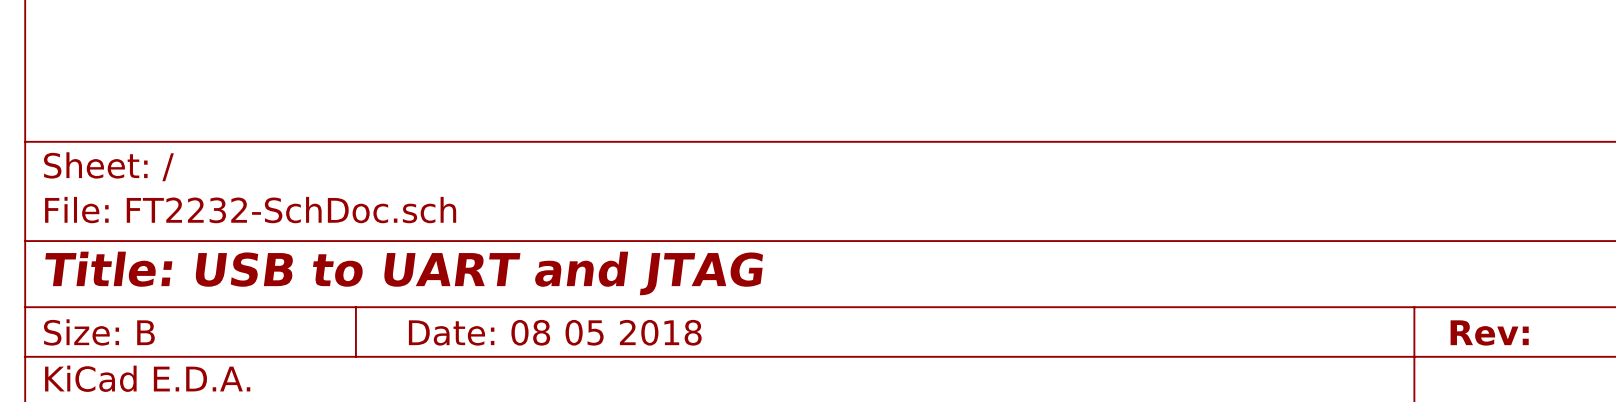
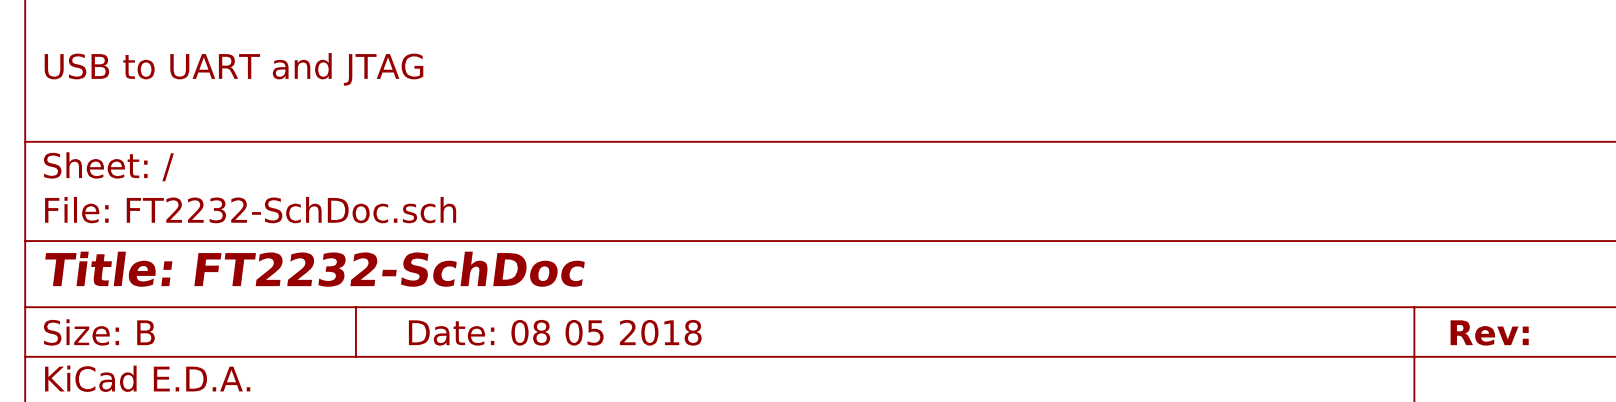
title block: none -> USB to UART and JTAG (233, 69)
title block: Title: USB to UART and JTAG (404, 273) -> Title: FT2232-SchDoc (315, 269)

